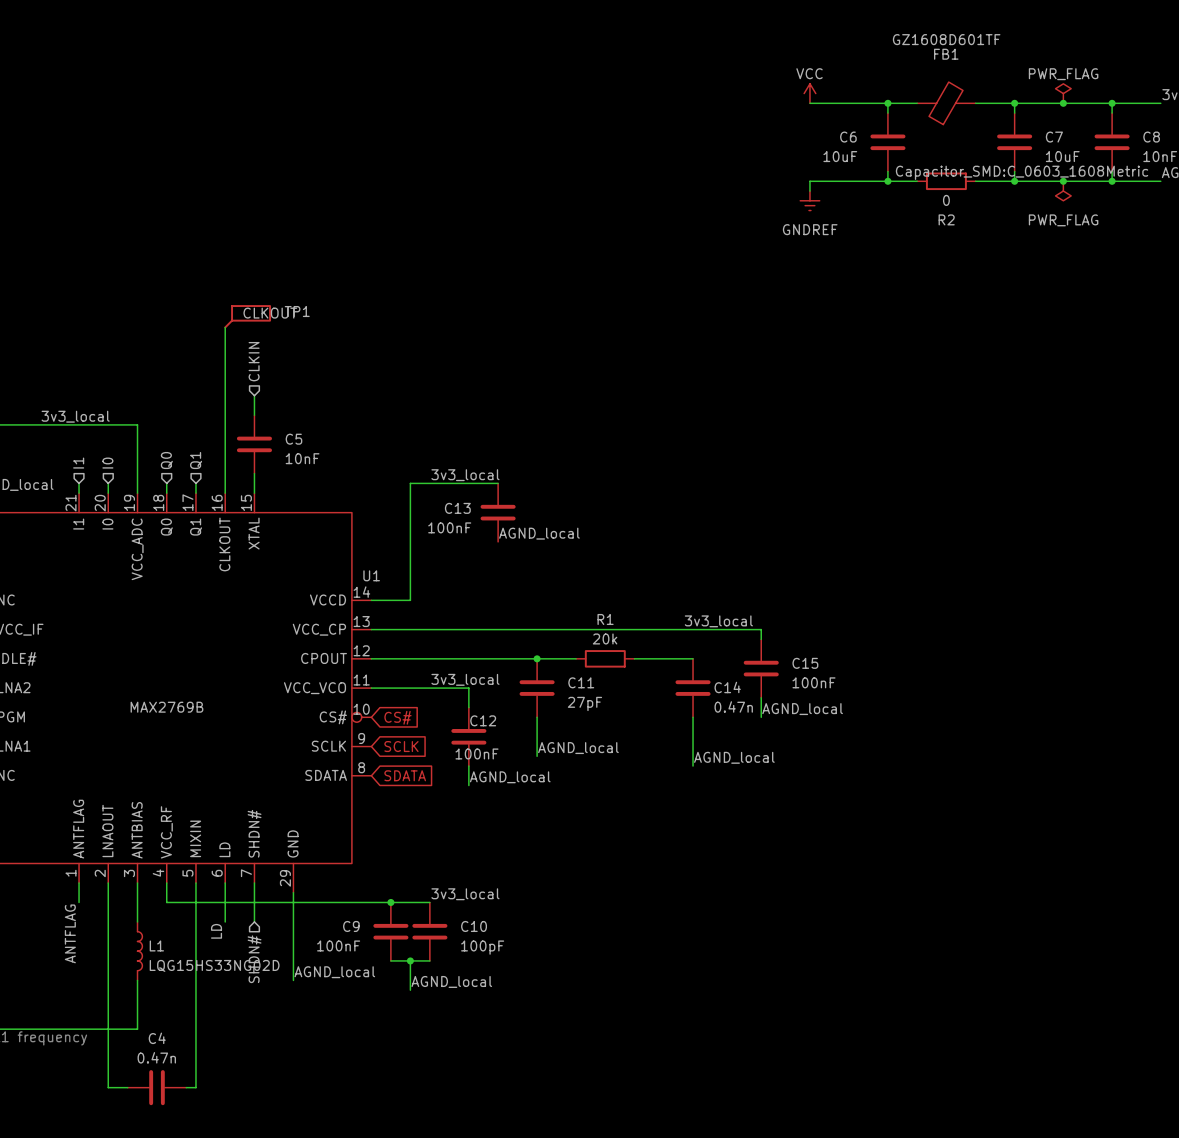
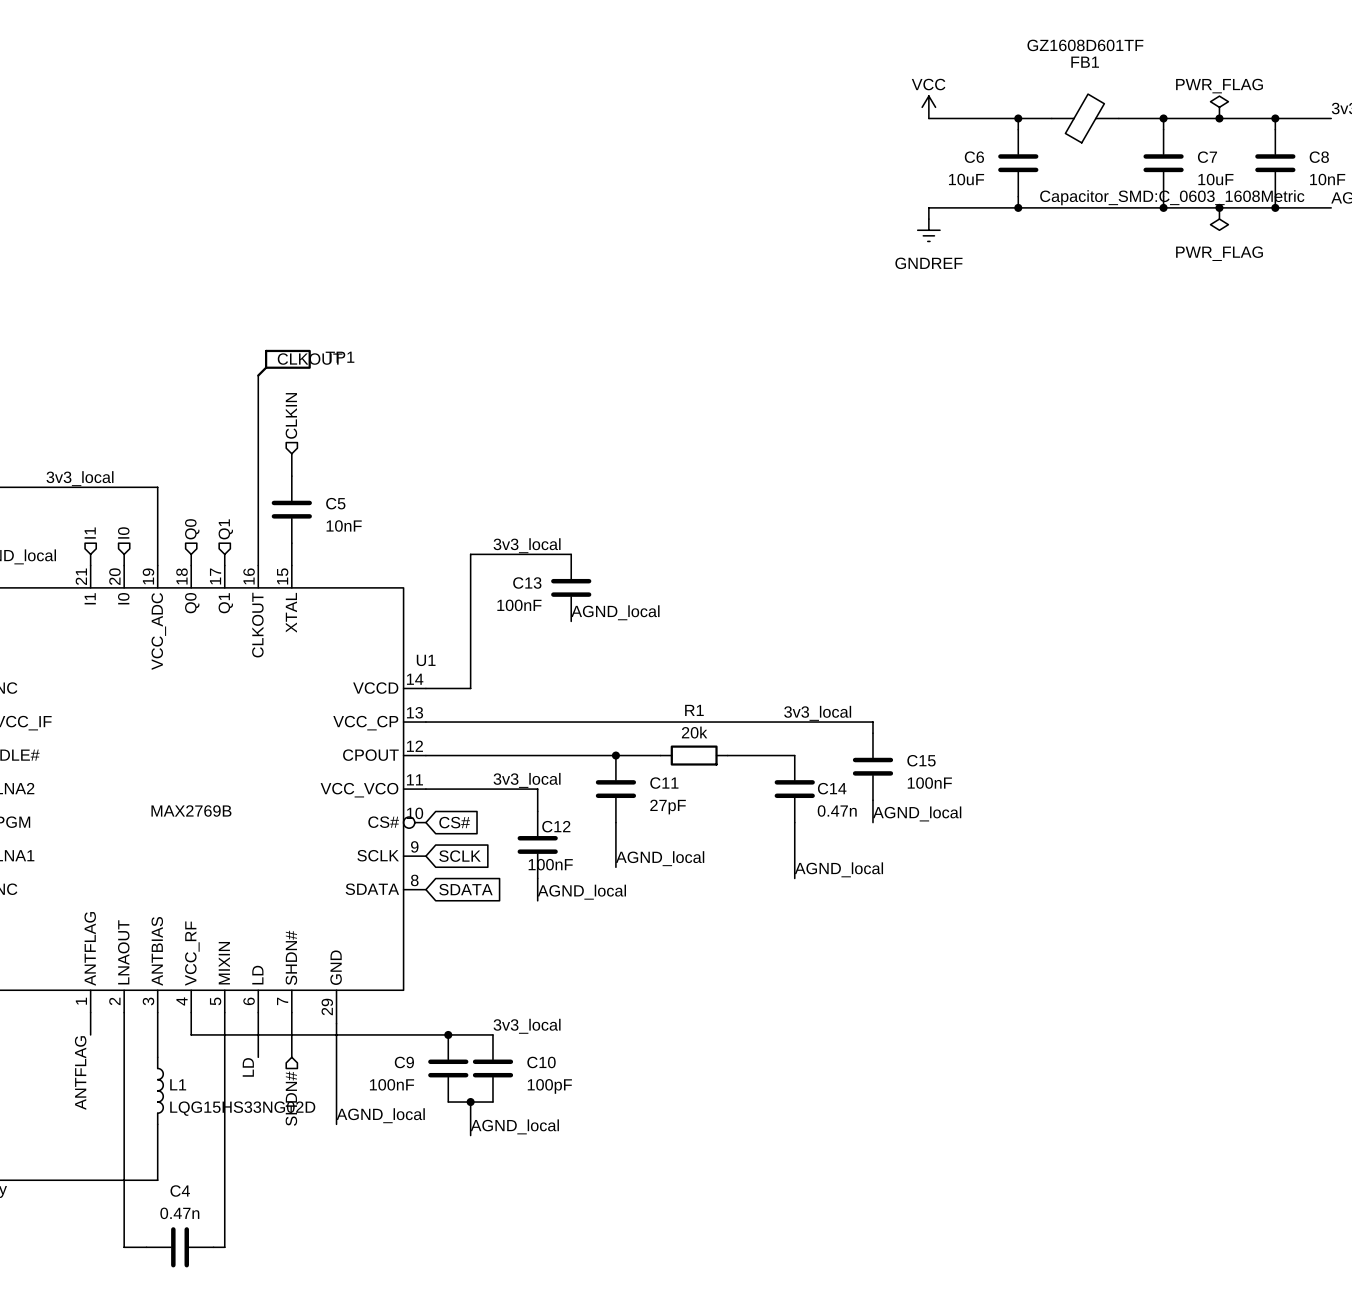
wire: none -> (1051, 207) (1118, 207)
R2: 0 (946, 181) -> none

